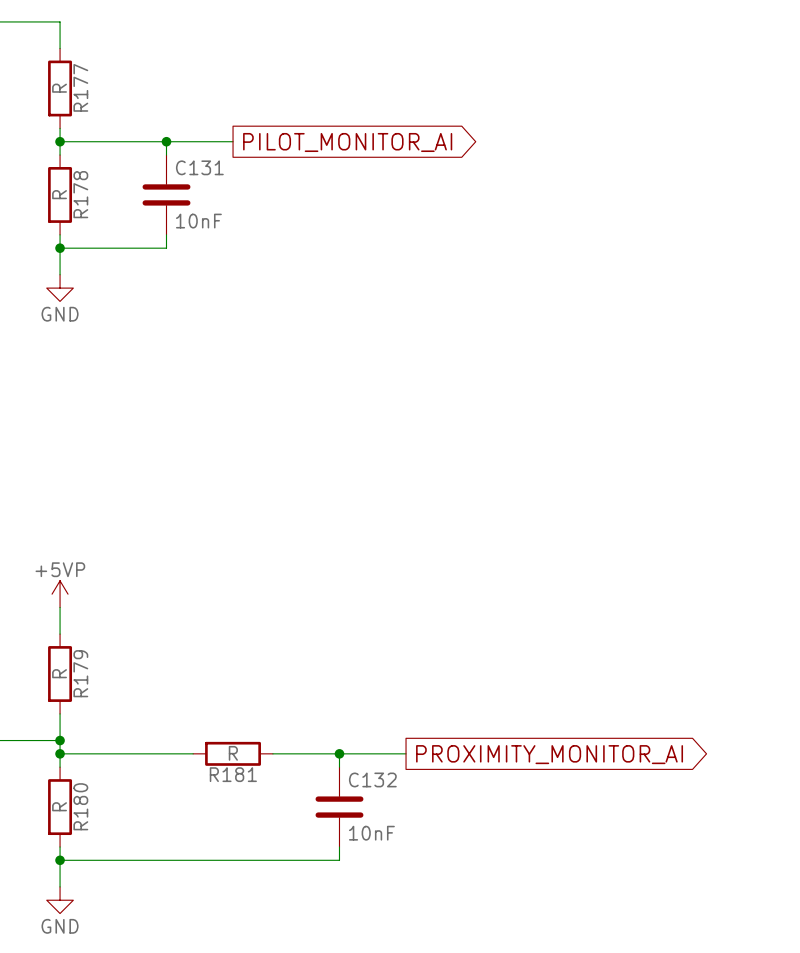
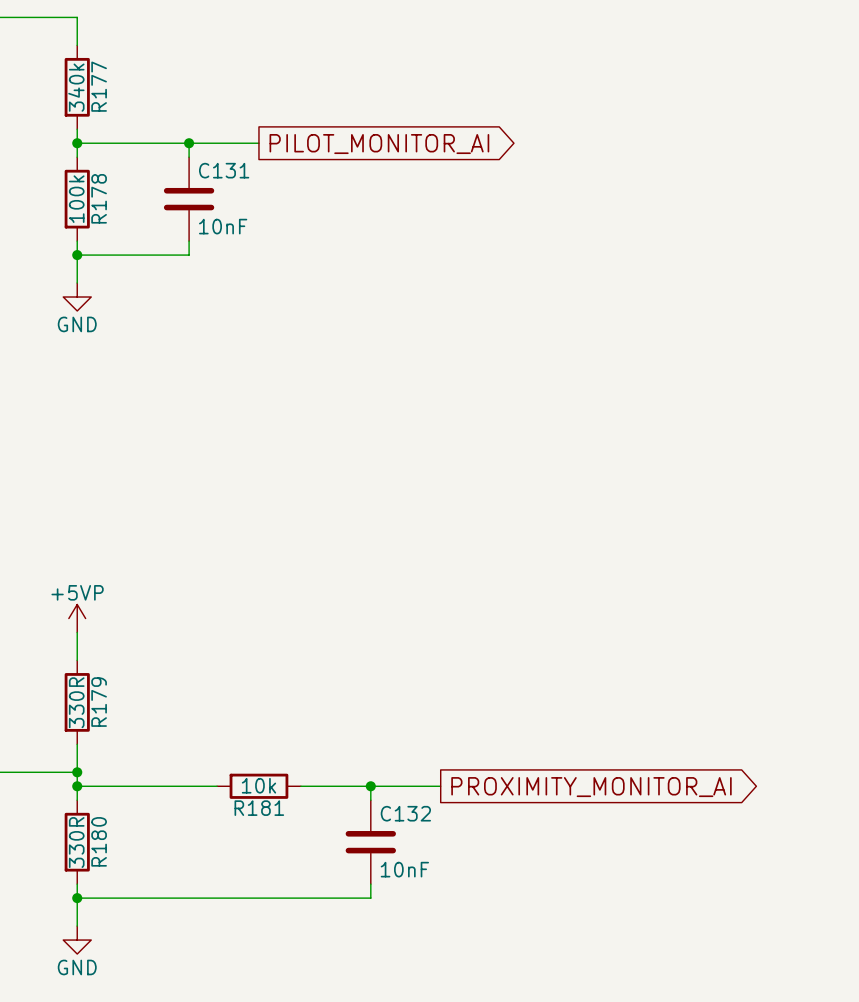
R177 value: R (59, 88) -> 340k (76, 87)
R178 value: R (59, 194) -> 100k (76, 199)
R179 value: R (59, 673) -> 330R (76, 702)
R181 value: R (233, 753) -> 10k (258, 785)
R180 value: R (59, 806) -> 330R (76, 842)

